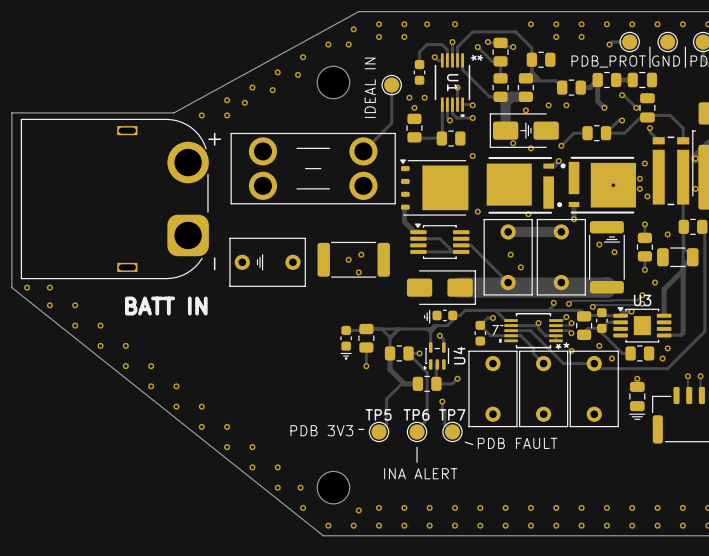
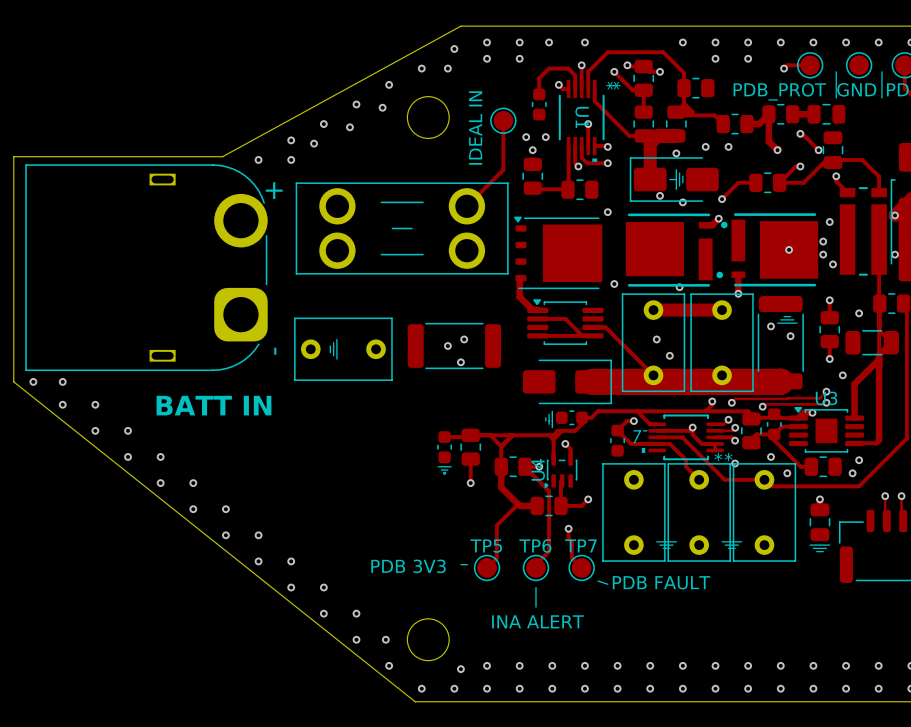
U4 name position: U4 (459, 355) -> U4 (538, 469)
line: none -> (656, 541) (676, 541)
line: none -> (722, 541) (741, 541)
line: none -> (660, 545) (673, 545)
line: none -> (725, 545) (738, 545)
line: none -> (663, 548) (669, 548)
line: none -> (728, 548) (735, 548)

